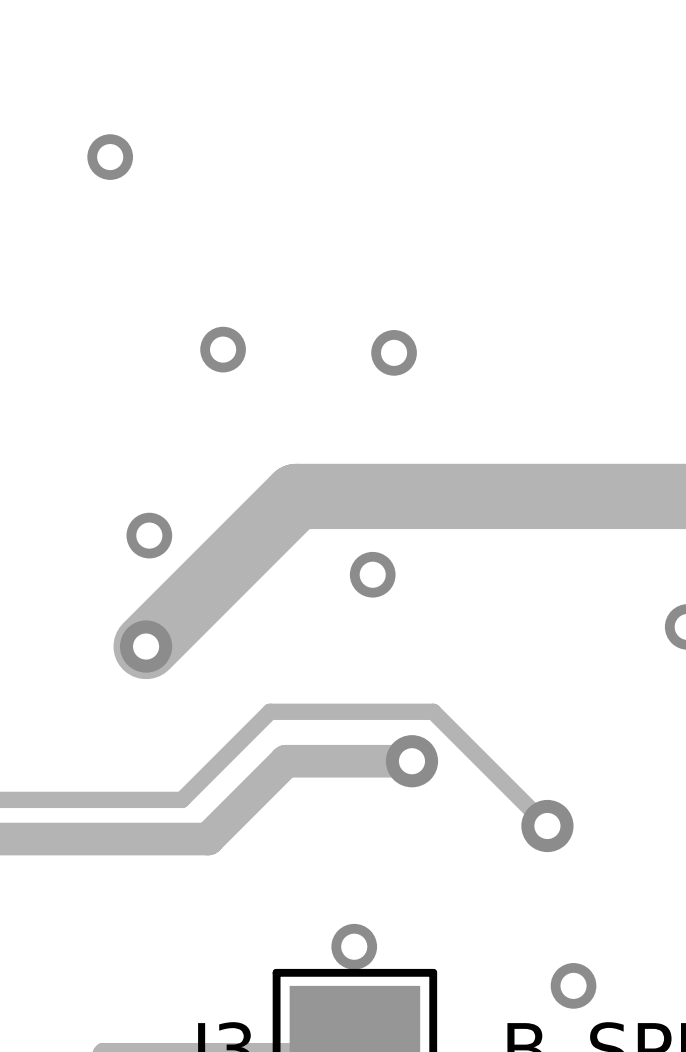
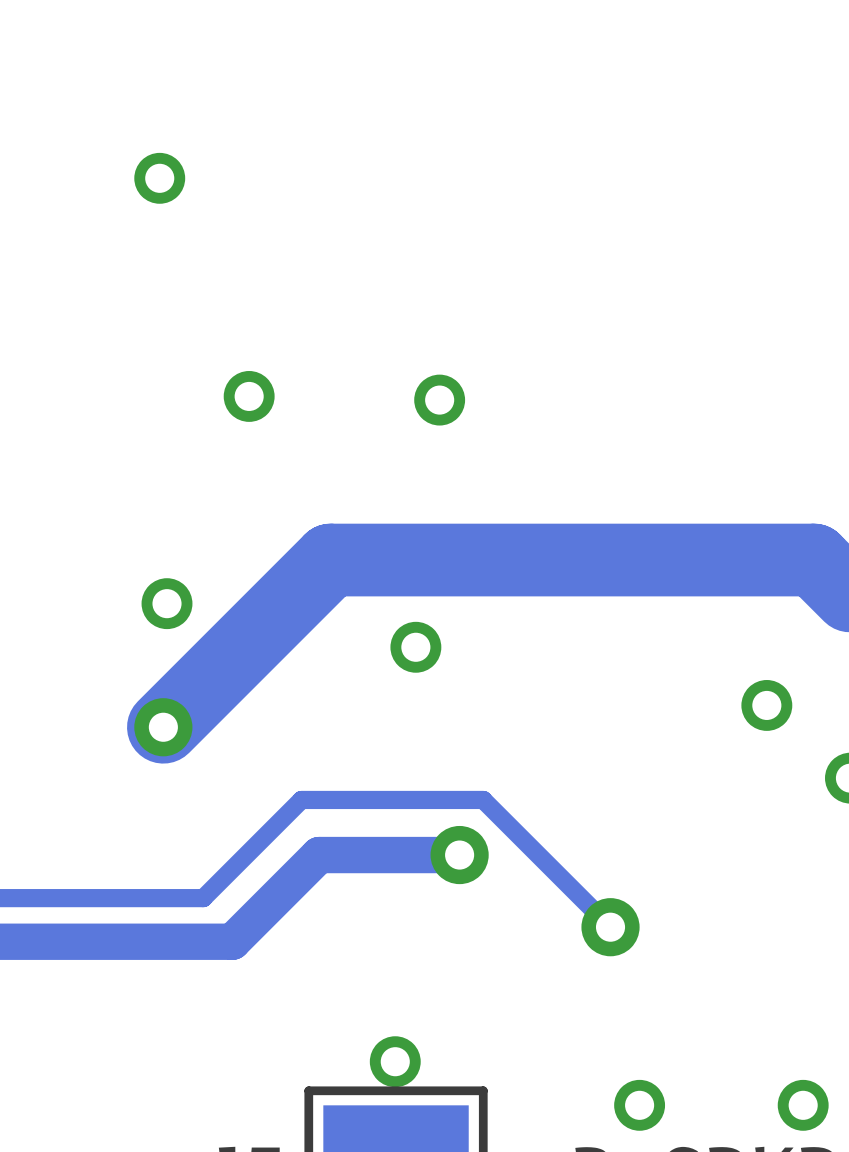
via position: (110, 157) -> (159, 178)

